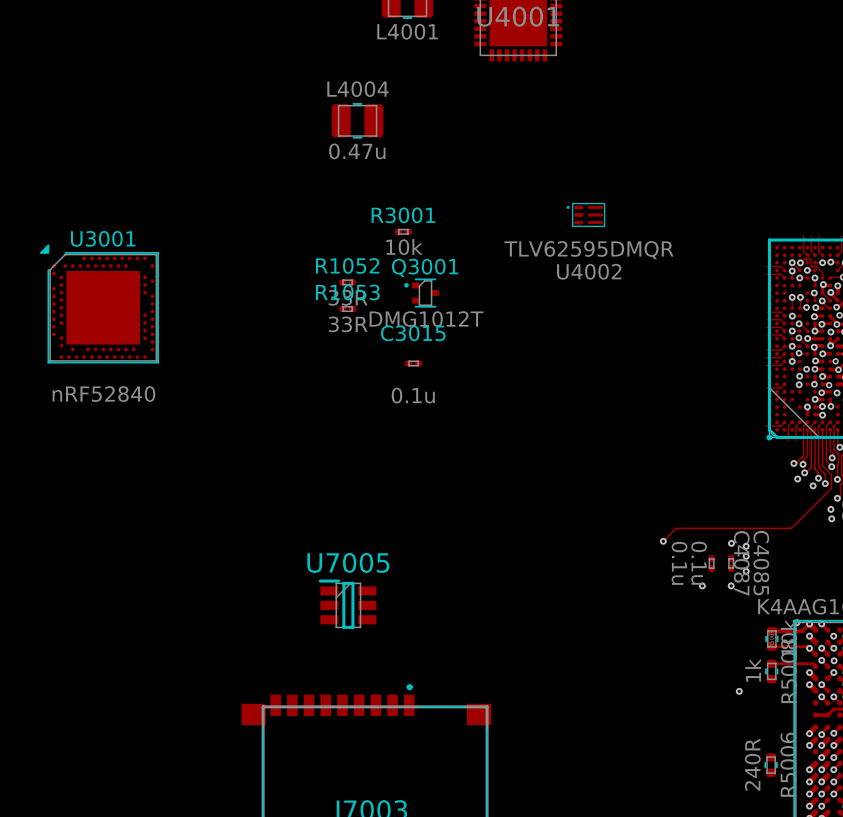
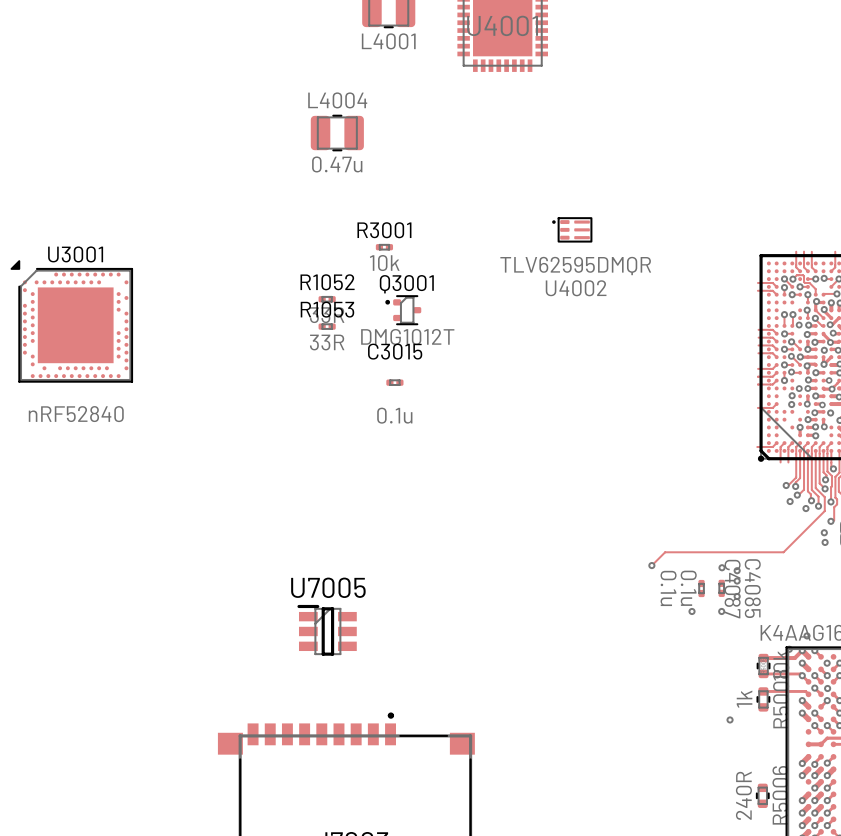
via: none -> (807, 635)

